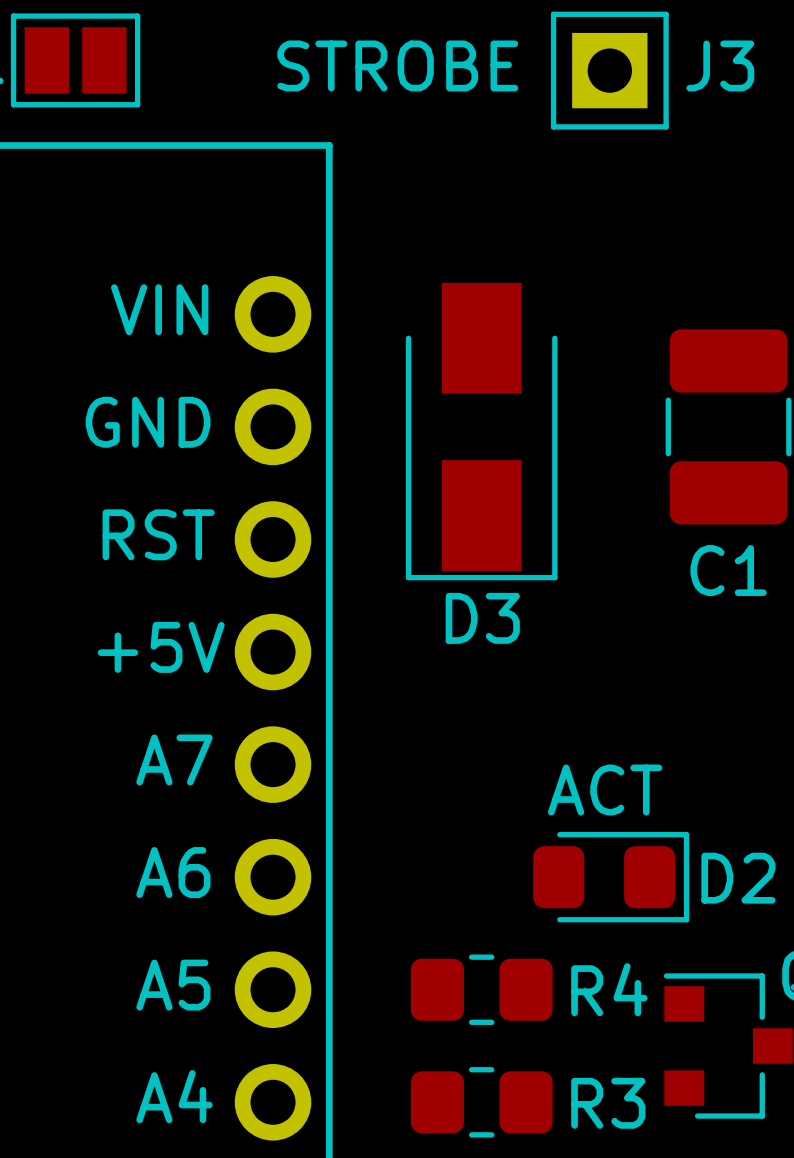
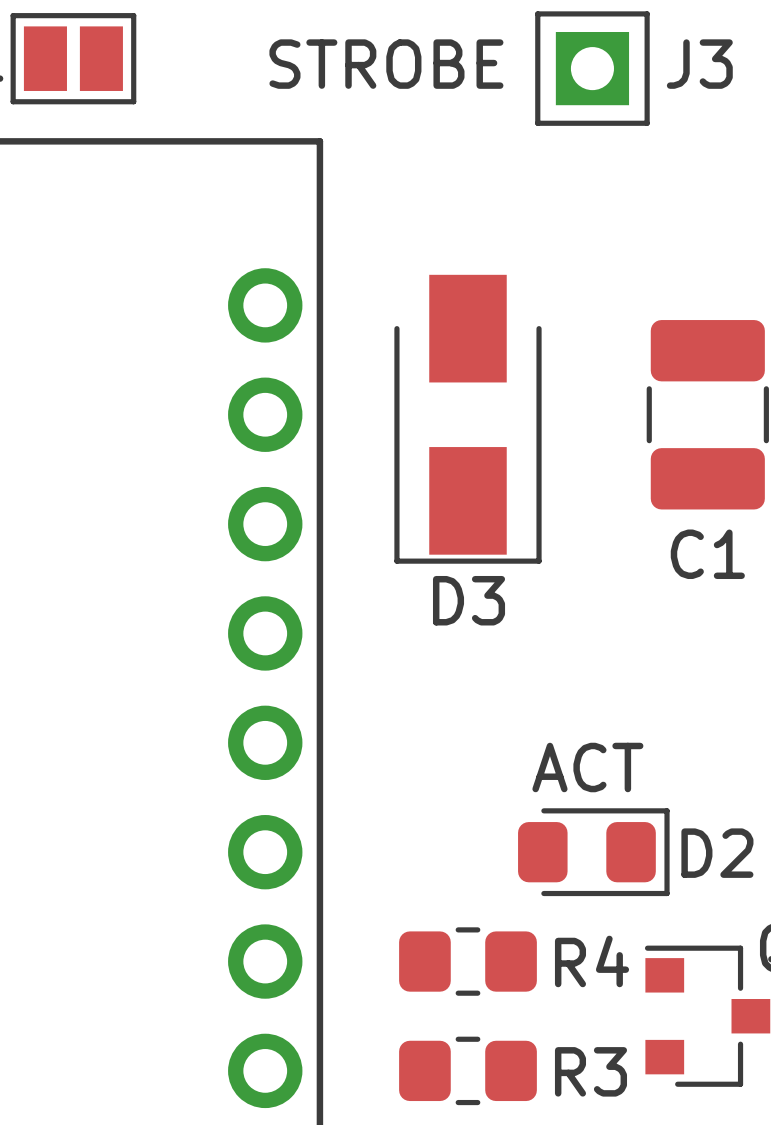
text: VIN (159, 309) -> none
text: GND (148, 422) -> none
text: RST (158, 534) -> none
text: +5V (161, 647) -> none
text: A7 (174, 759) -> none
text: A6 (173, 872) -> none
text: A5 (173, 985) -> none
text: A4 (174, 1096) -> none

